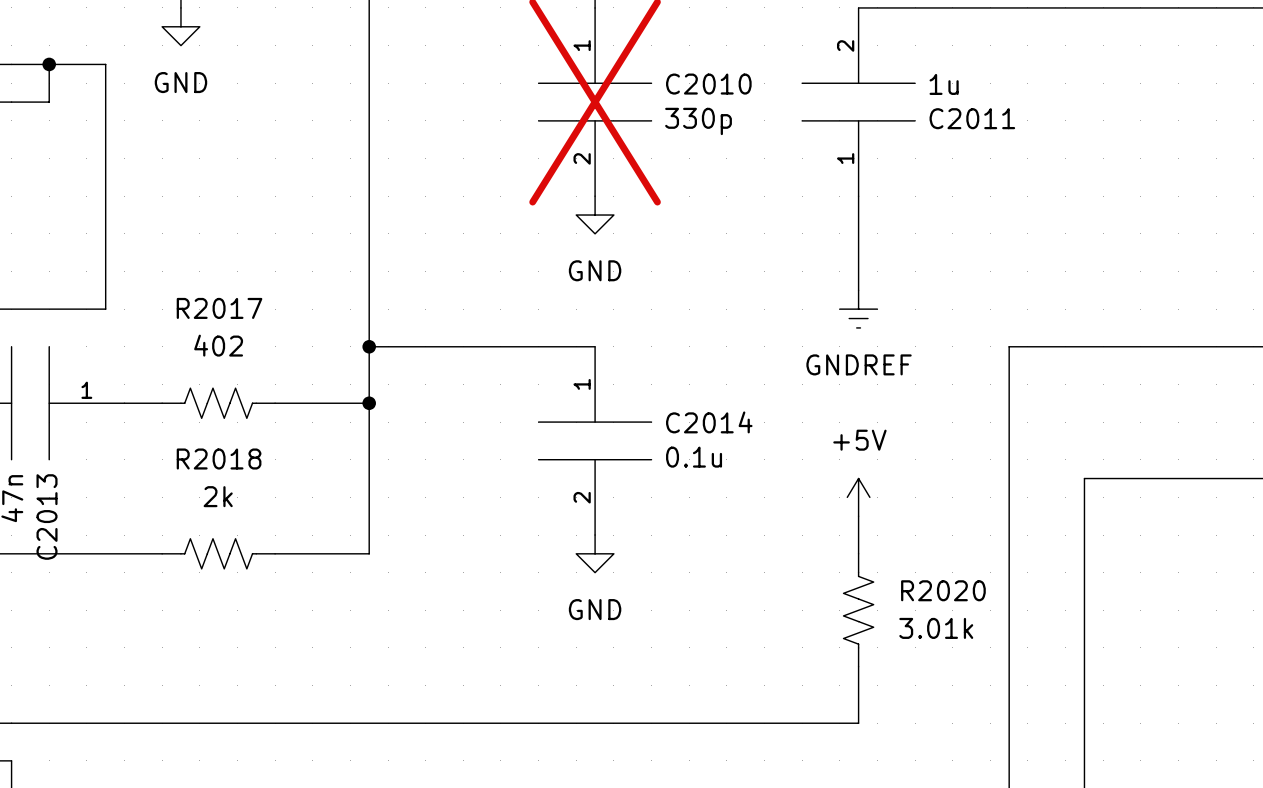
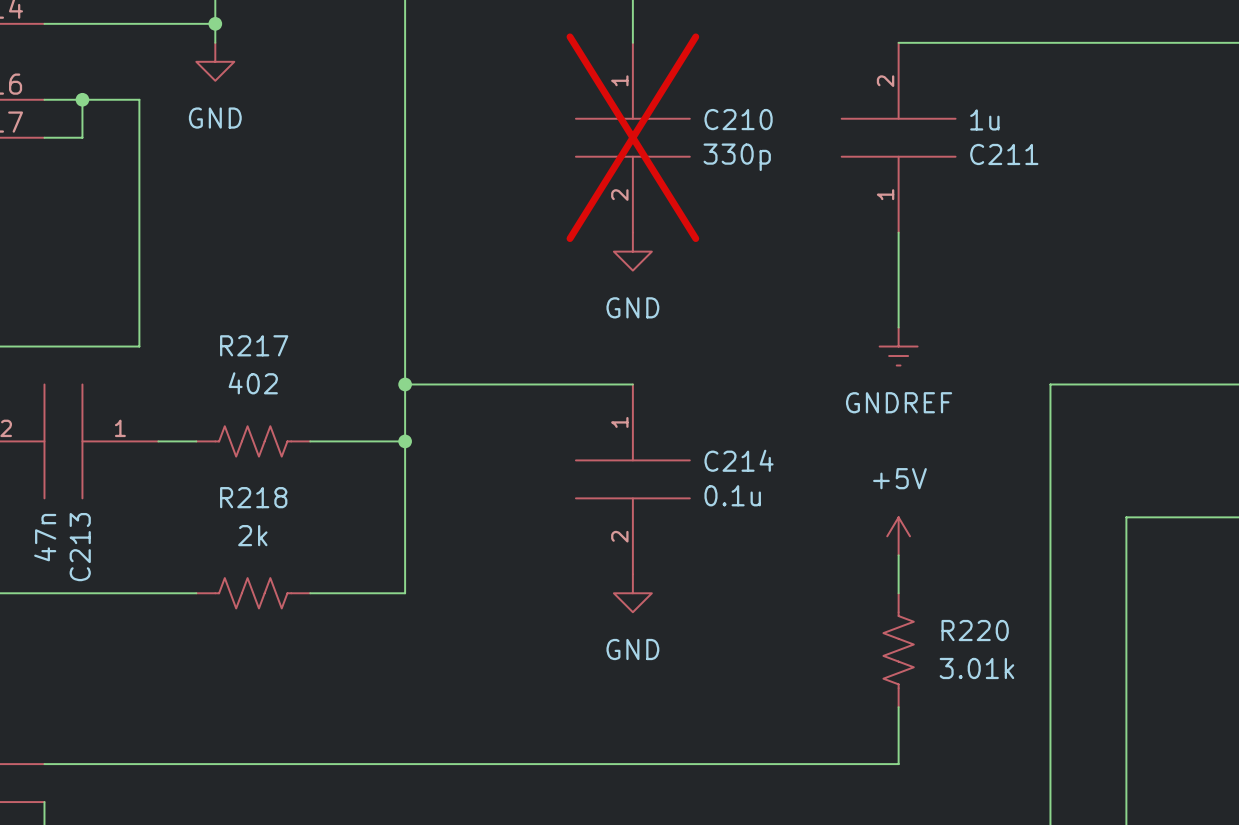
C2010 name: C2010 (708, 84) -> C210 (738, 119)
C2011 name: C2011 (972, 118) -> C211 (1004, 154)
R2017 name: R2017 (219, 308) -> R217 (254, 345)
C2014 name: C2014 (709, 422) -> C214 (739, 460)
R2018 name: R2018 (219, 459) -> R218 (253, 497)
C2013 name: C2013 (47, 517) -> C213 (80, 547)
R2020 name: R2020 (943, 590) -> R220 (975, 630)

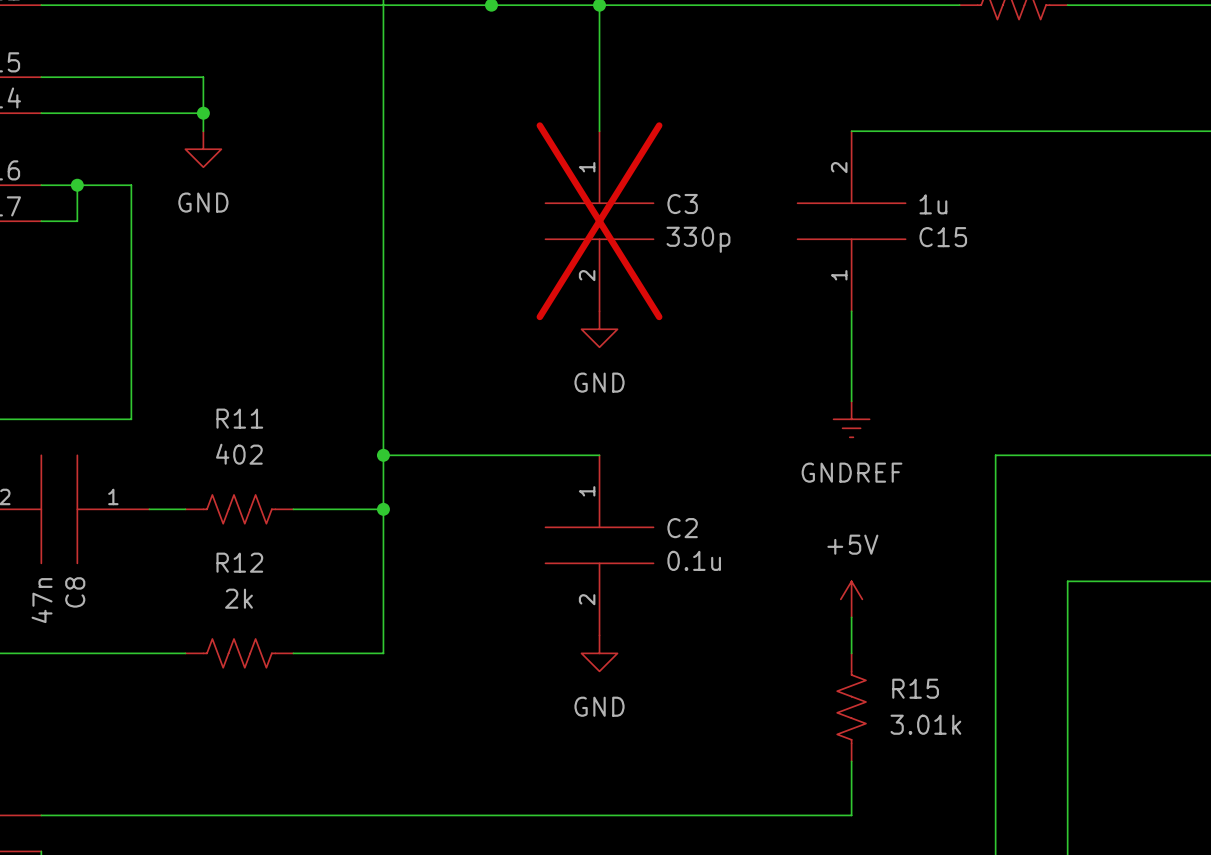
C210 name: C210 (738, 119) -> C3 (682, 204)
C211 name: C211 (1004, 154) -> C15 (943, 237)
R217 name: R217 (254, 345) -> R11 (239, 418)
C214 name: C214 (739, 460) -> C2 (682, 528)
R218 name: R218 (253, 497) -> R12 (239, 562)
C213 name: C213 (80, 547) -> C8 (75, 592)
R220 name: R220 (975, 630) -> R15 (915, 688)

